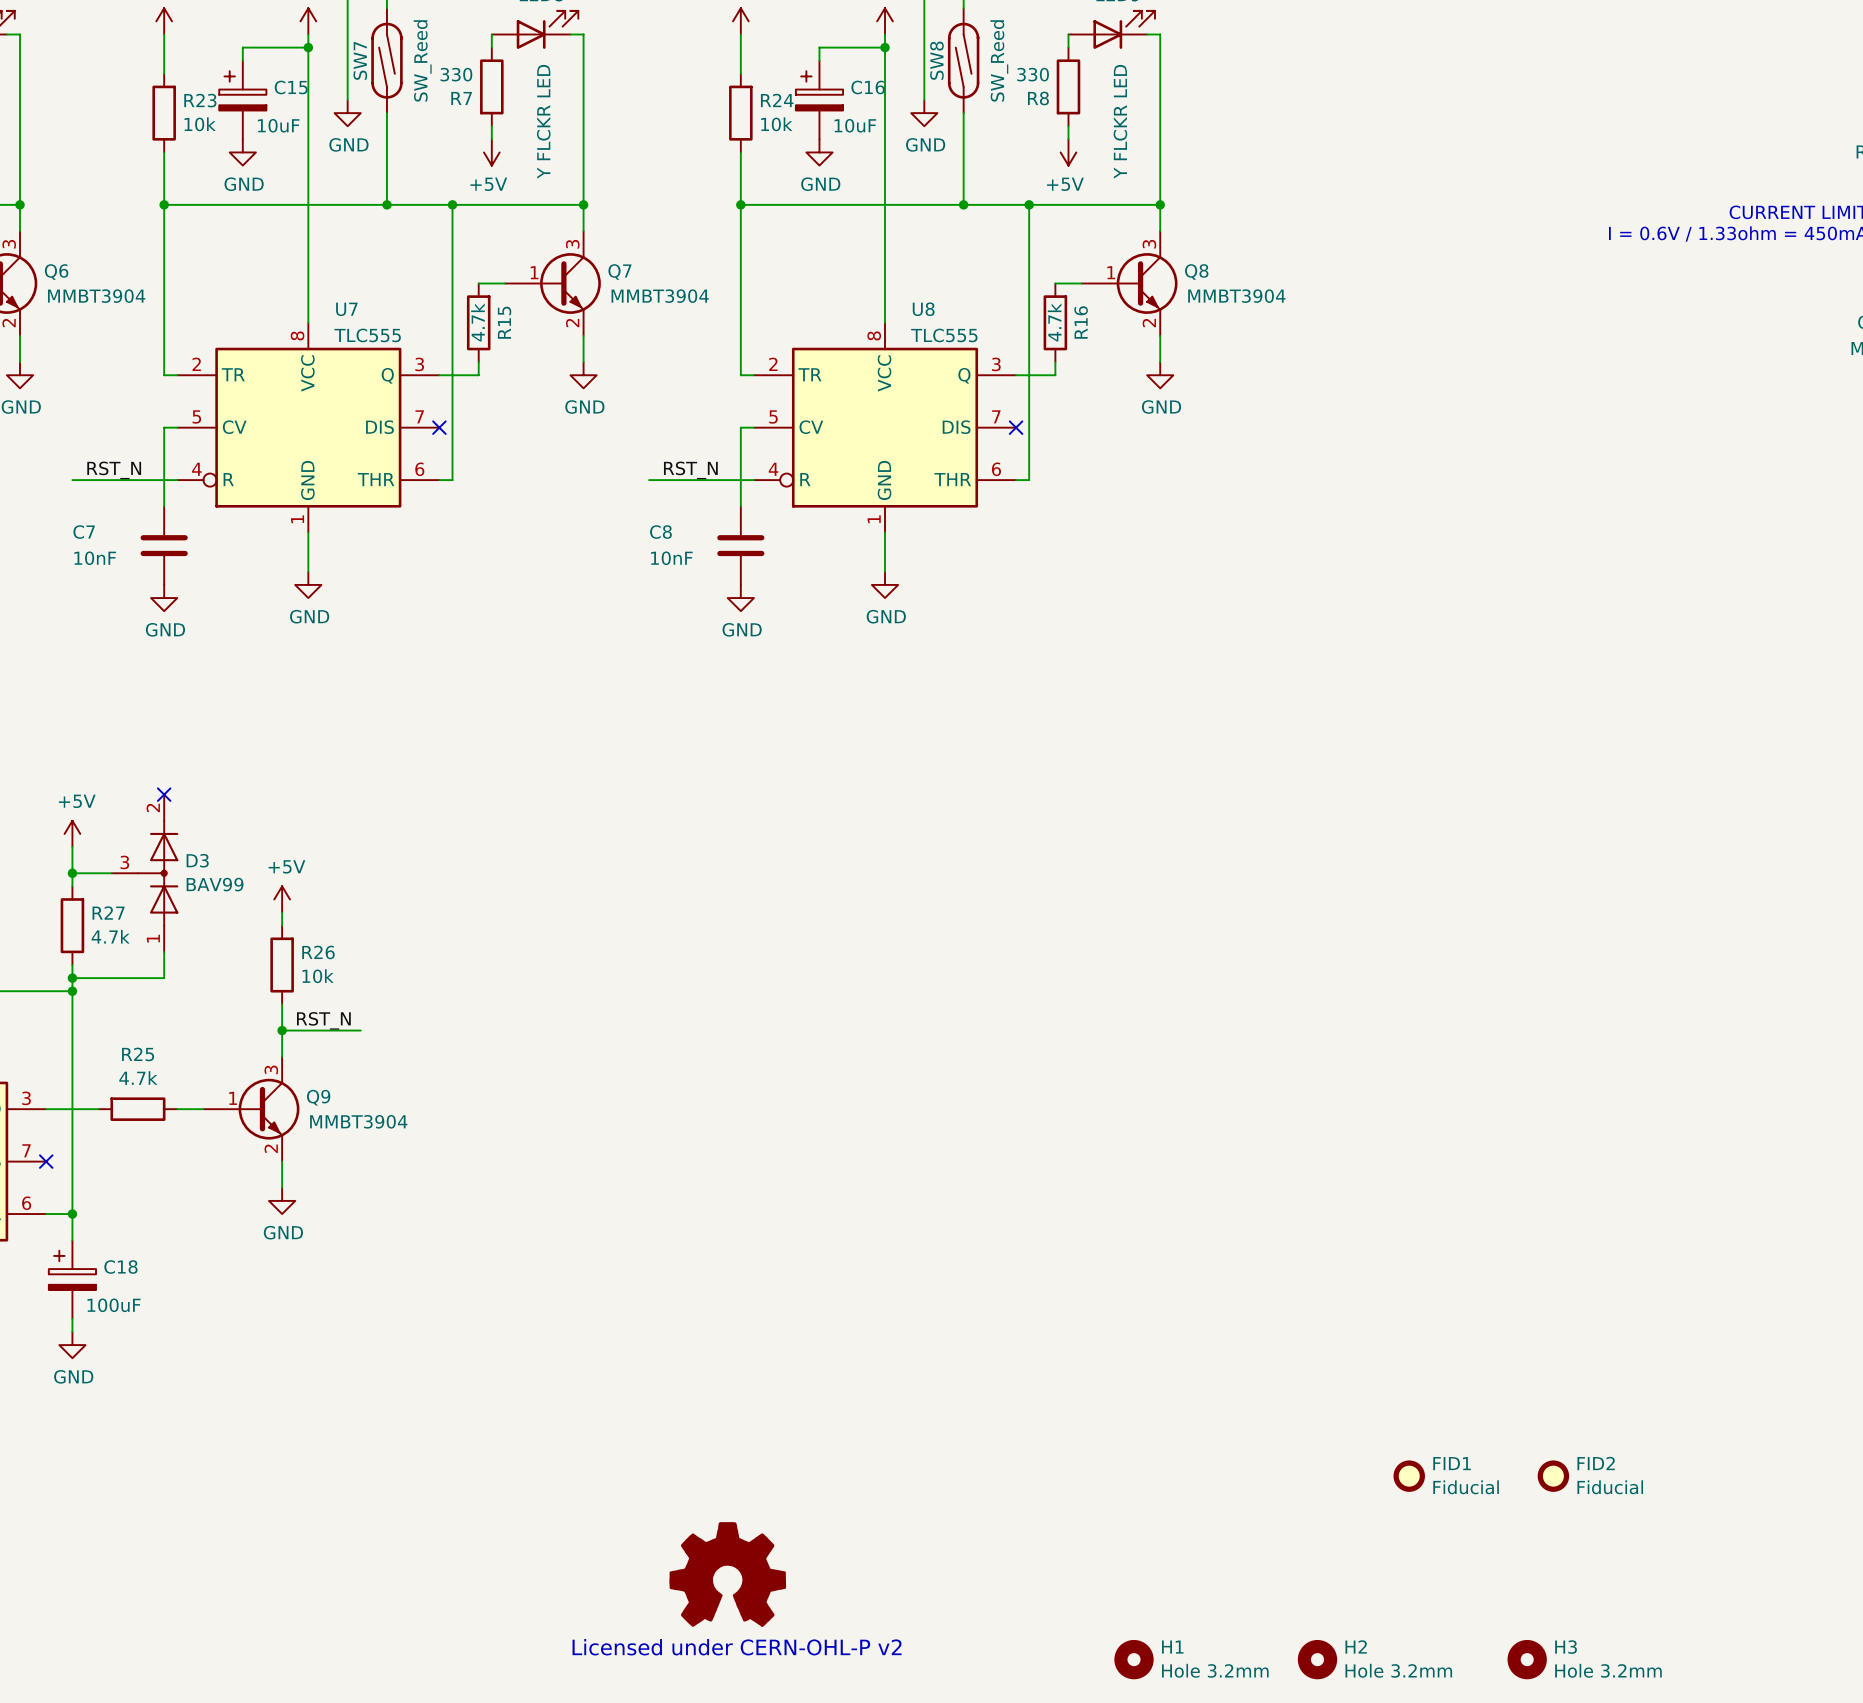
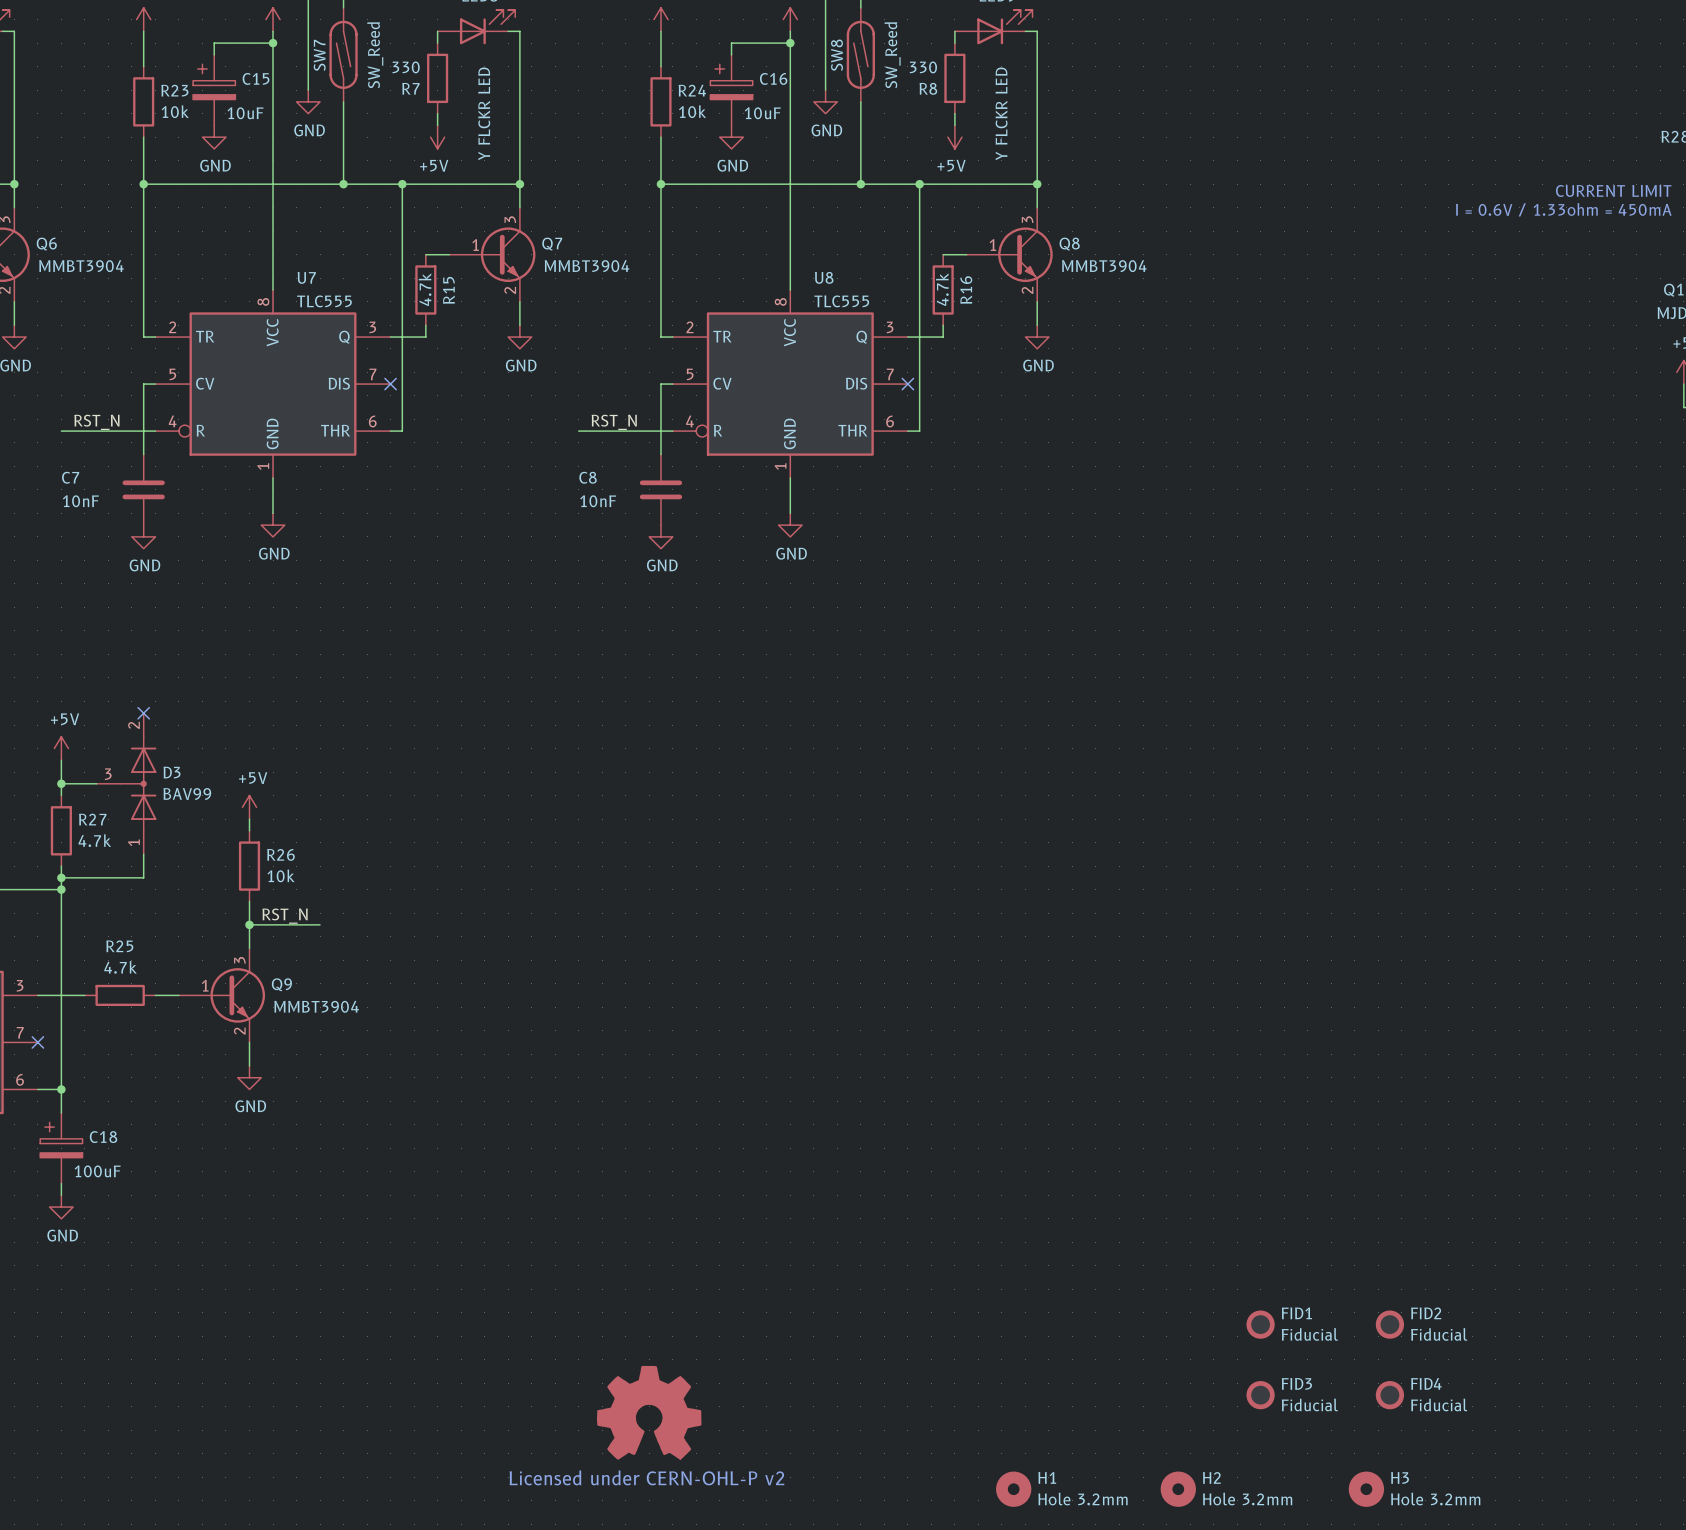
FID3: none -> Fiducial (1260, 1395)
FID4: none -> Fiducial (1389, 1395)

